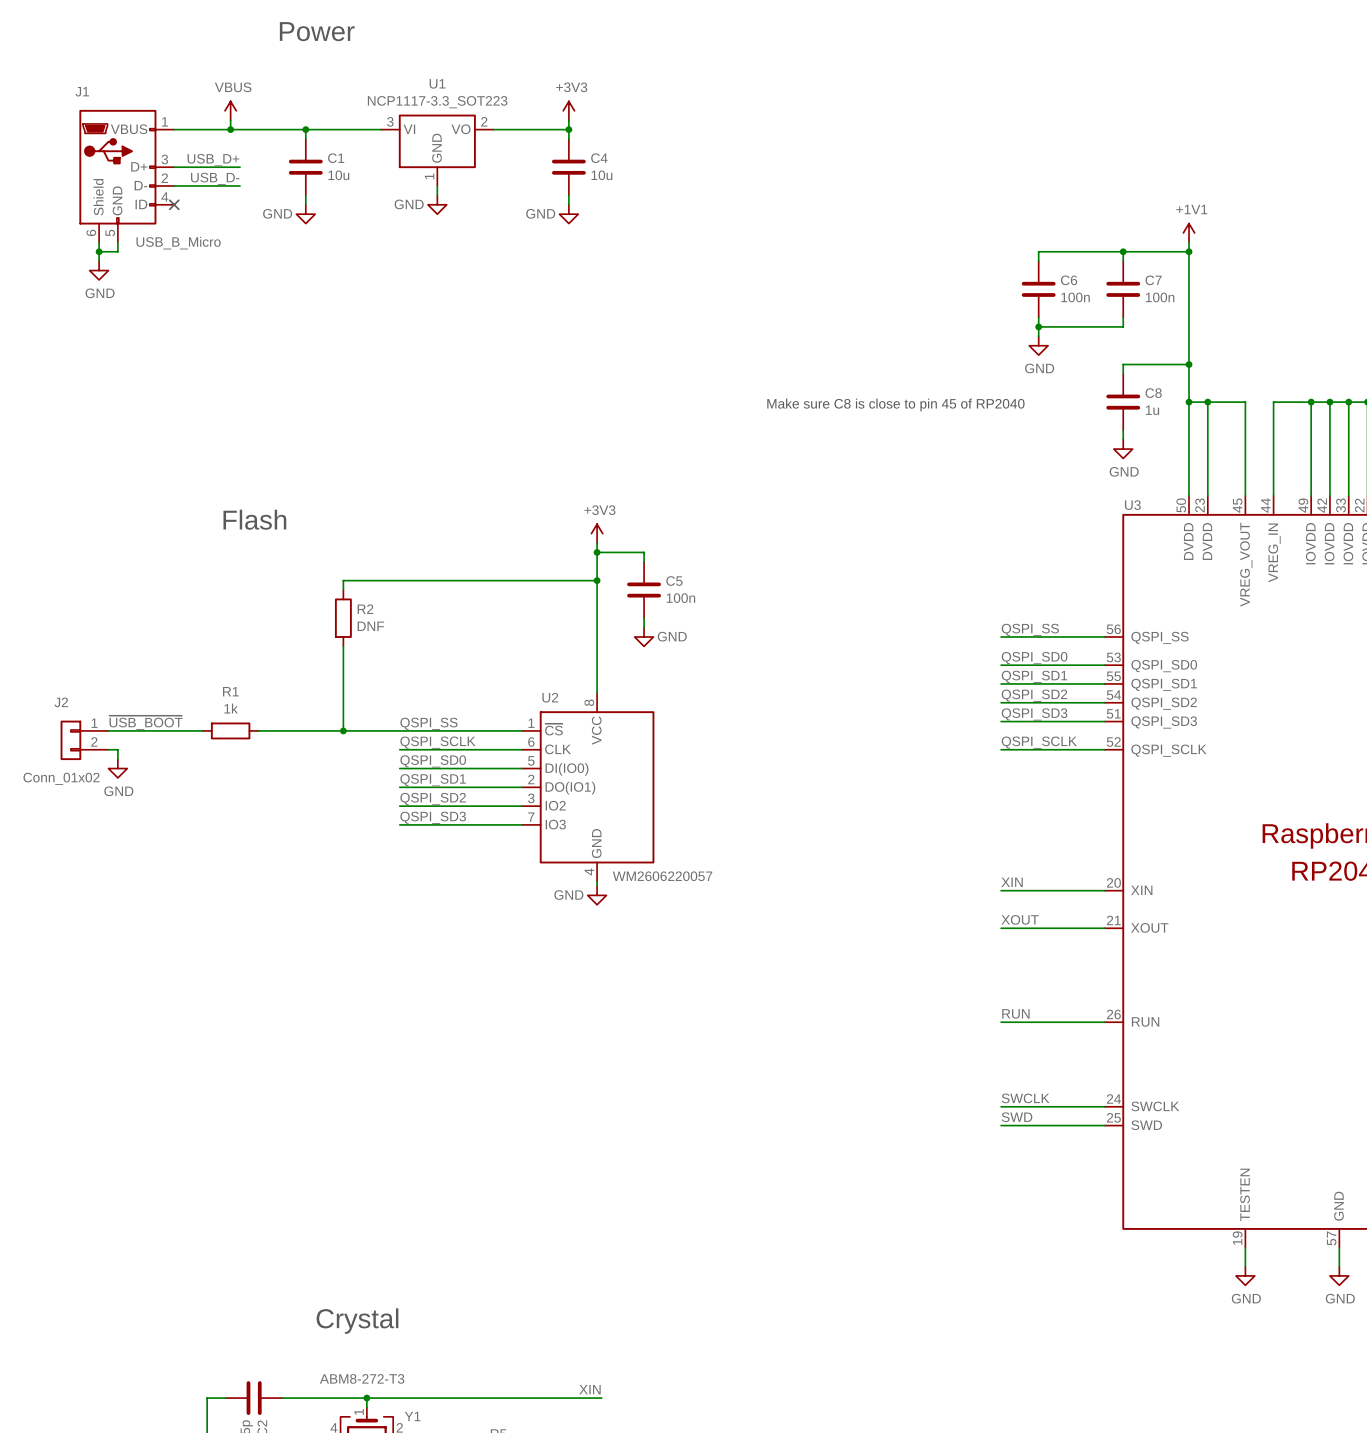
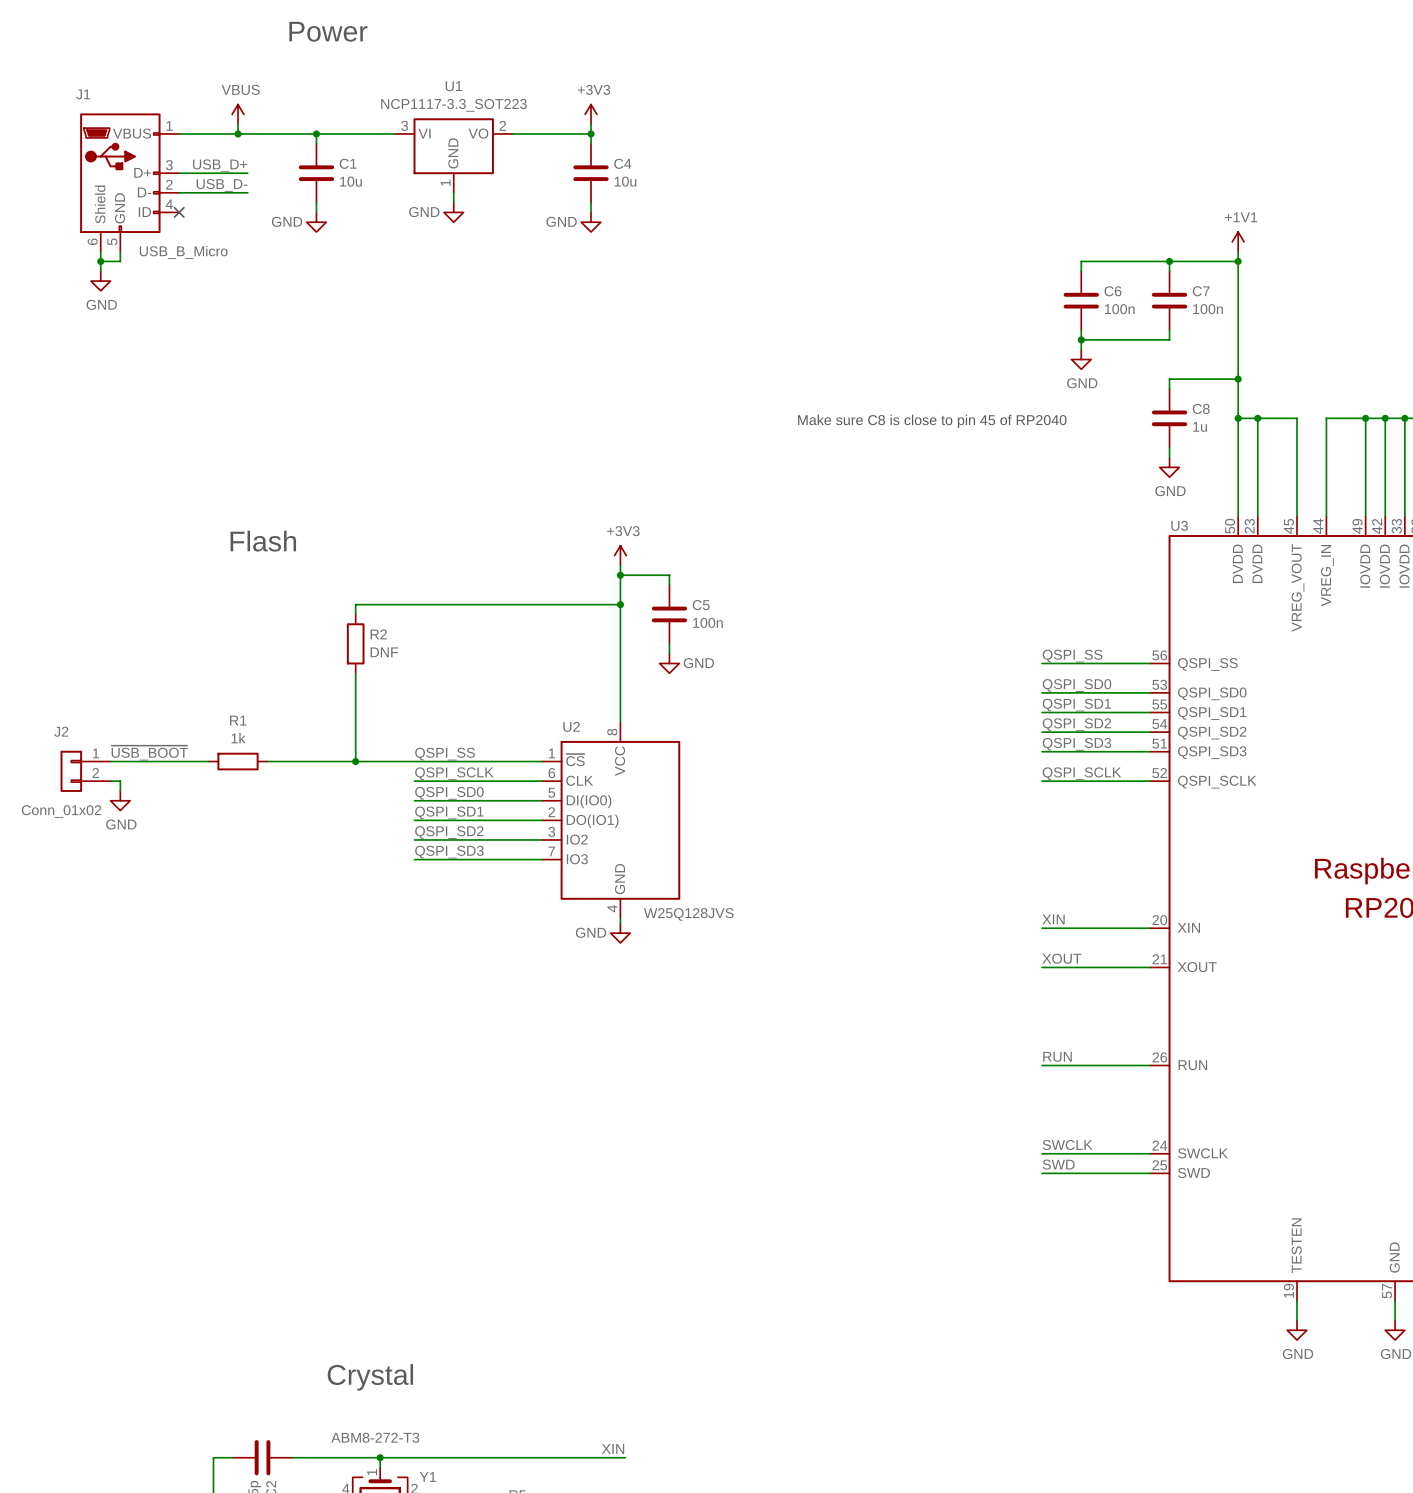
U2 value: WM2606220057 (662, 876) -> W25Q128JVS (688, 914)

